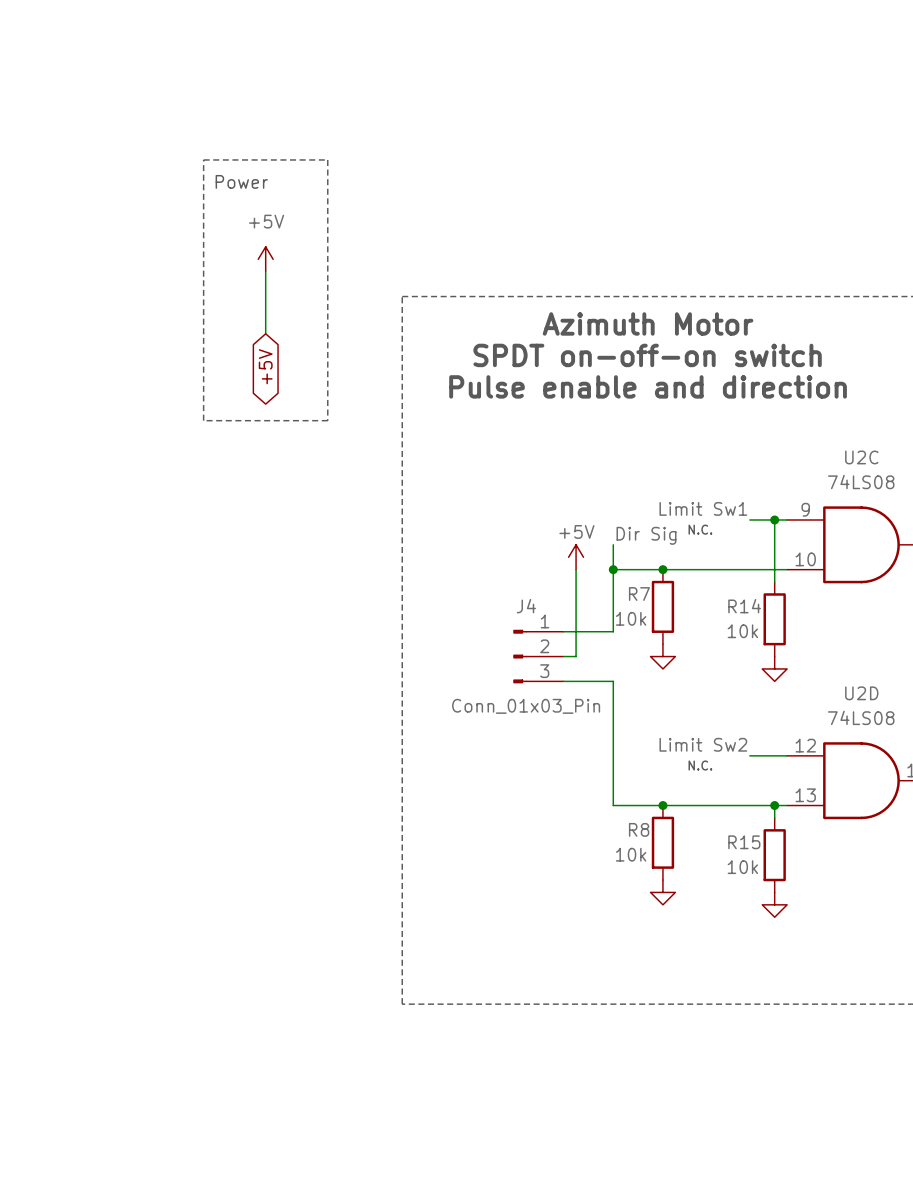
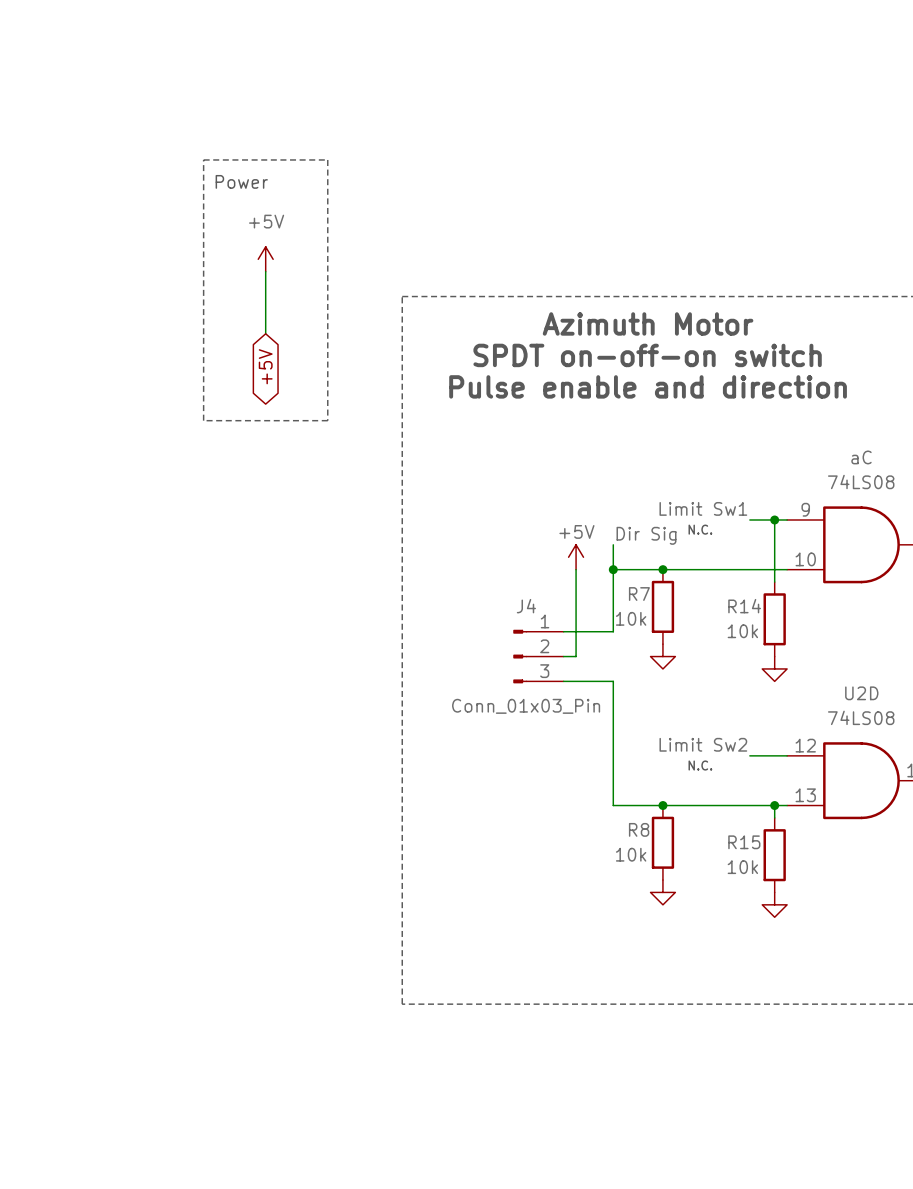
U2C name: U2C (861, 457) -> aC (861, 457)

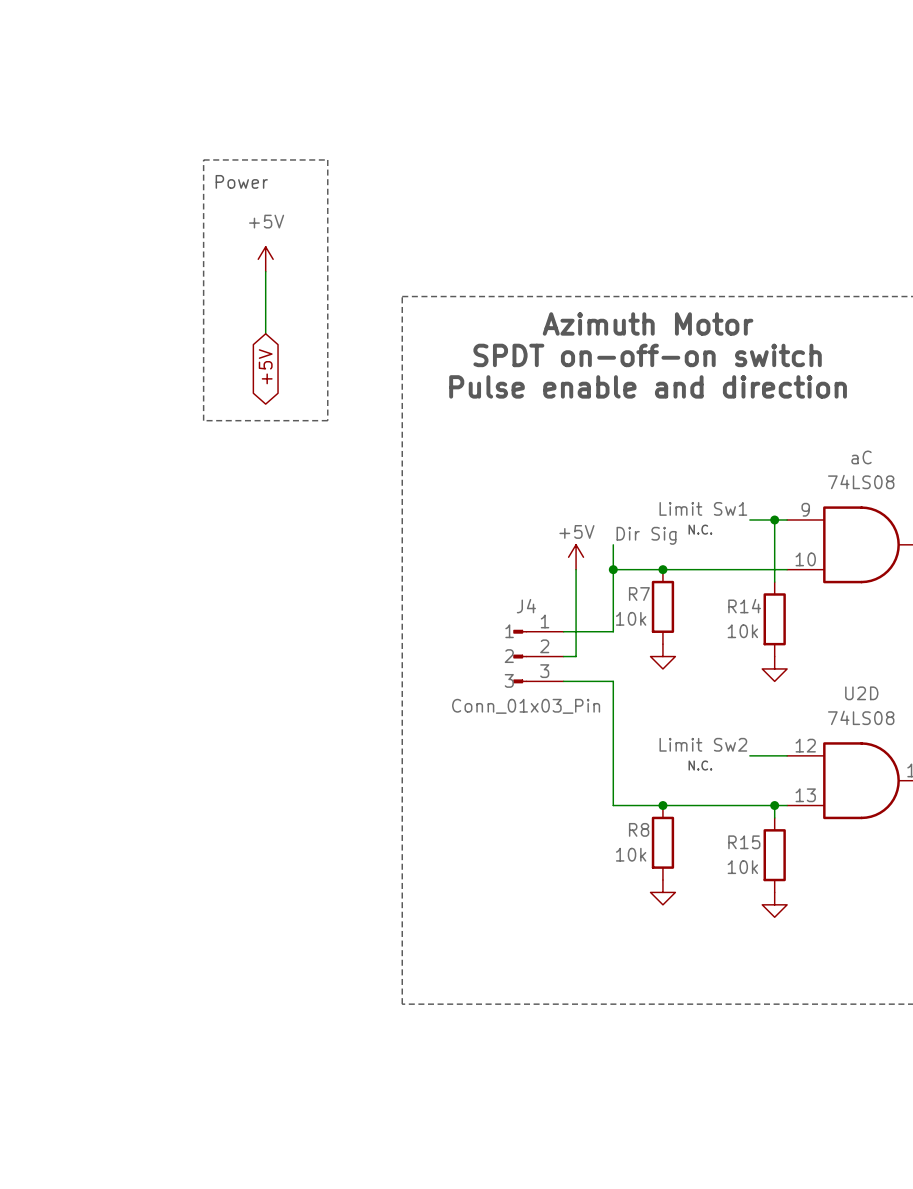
J4 pin name: none -> 1 (509, 631)
J4 pin name: none -> 2 (509, 656)
J4 pin name: none -> 3 (509, 680)

